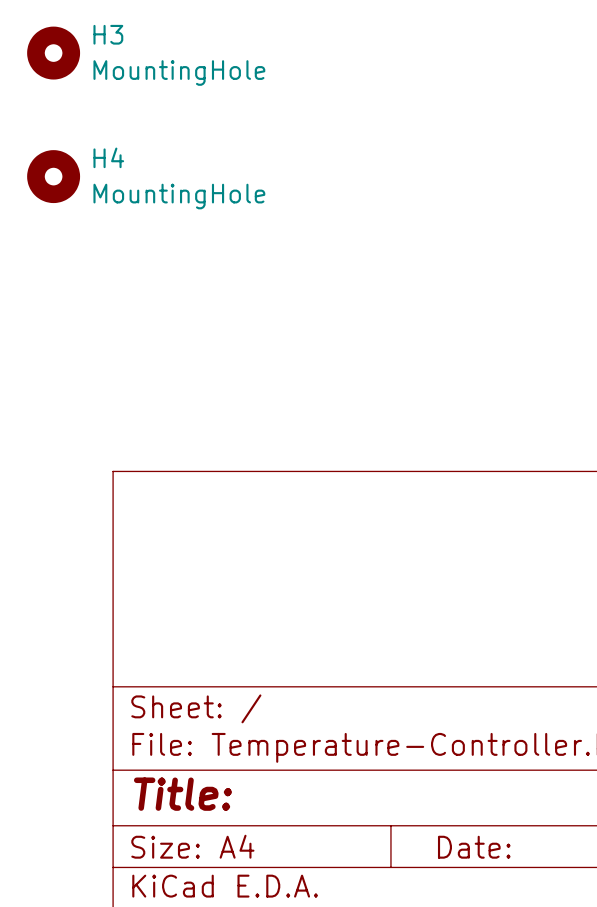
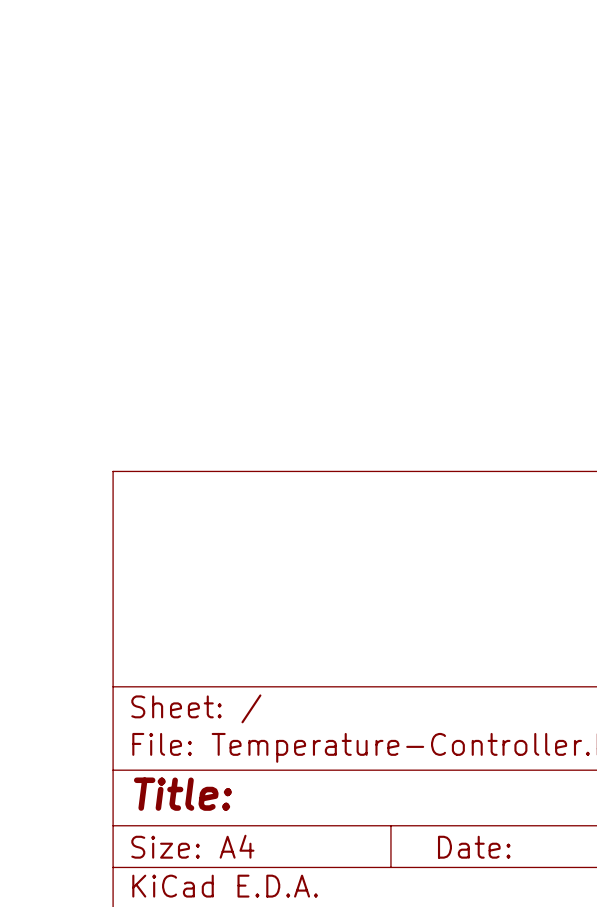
H3: MountingHole (53, 53) -> none
H4: MountingHole (53, 176) -> none

